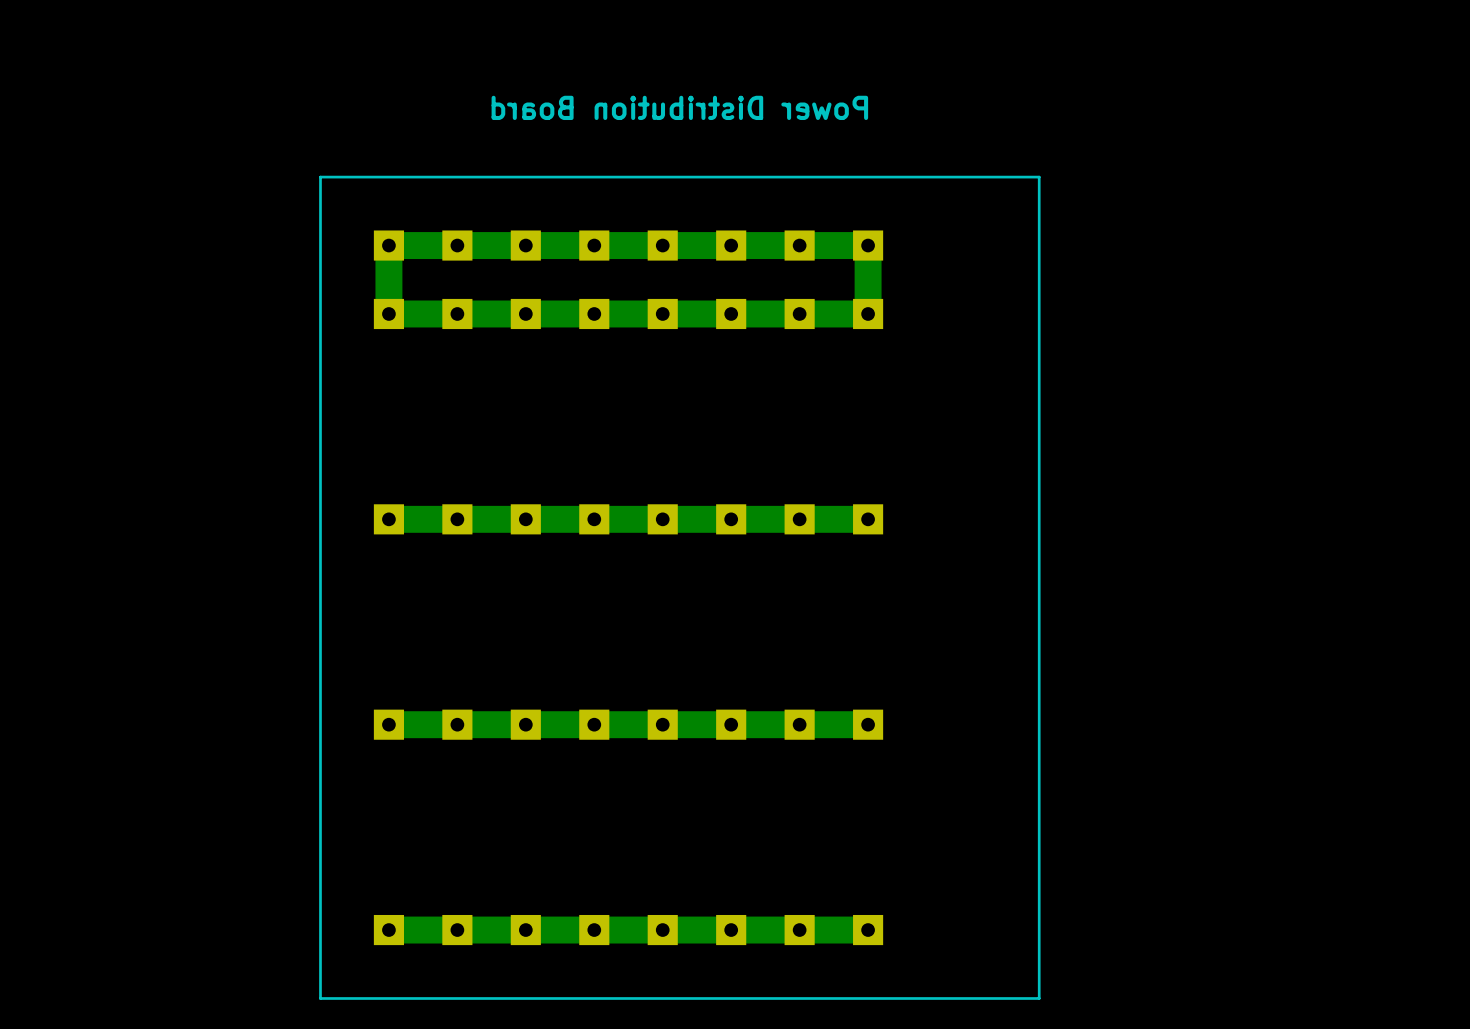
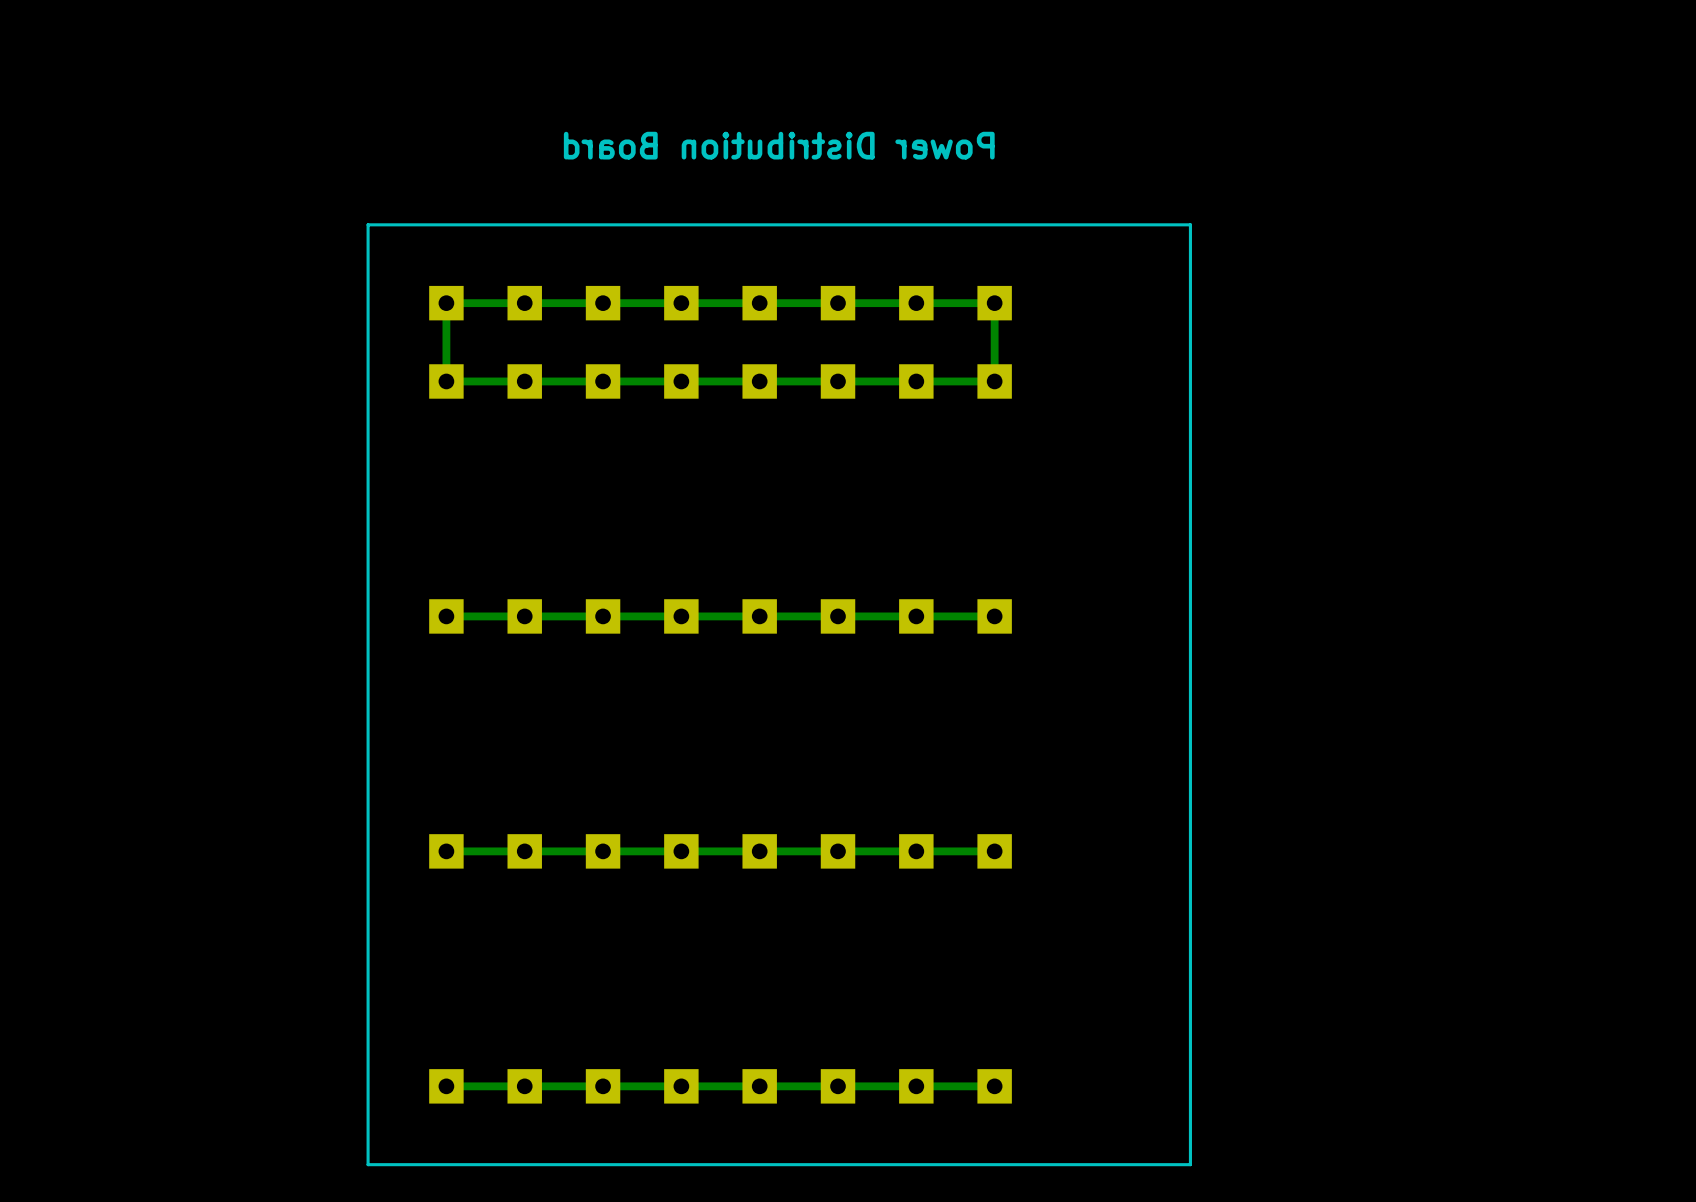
track width: thick (868, 245) (388, 245) (388, 313) (868, 313) (868, 245) -> thin (994, 303) (446, 303) (446, 381) (994, 381) (994, 303)
track width: thick (868, 519) (388, 519) -> thin (994, 616) (446, 616)
track width: thick (868, 724) (388, 724) -> thin (994, 851) (446, 851)
track width: thick (868, 930) (388, 930) -> thin (994, 1086) (446, 1086)

